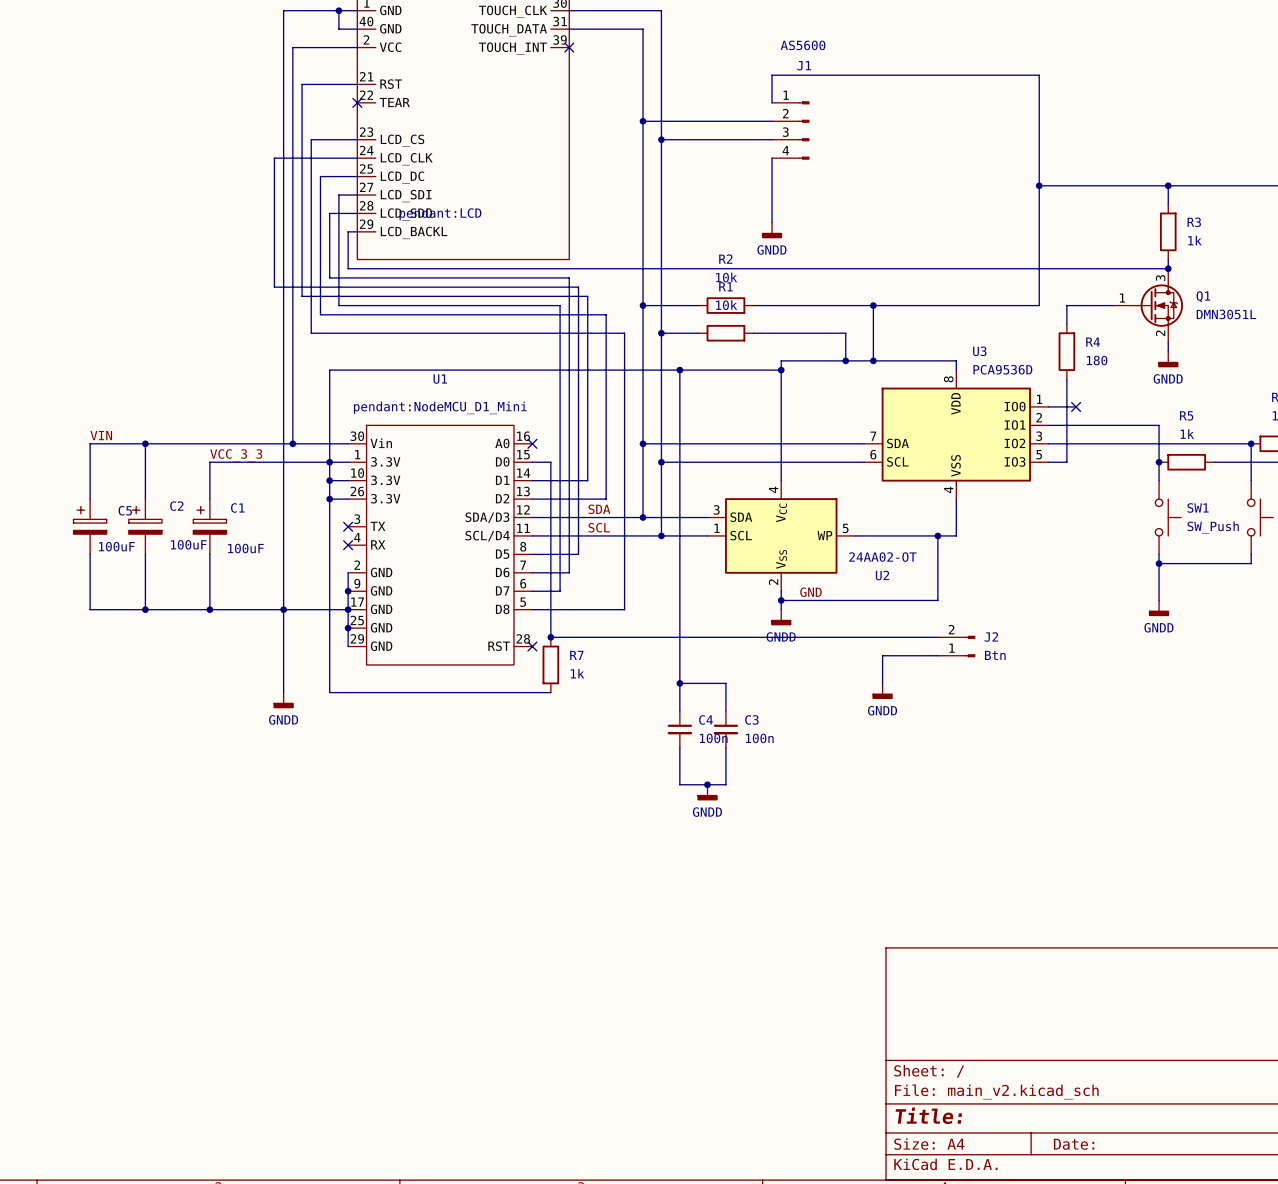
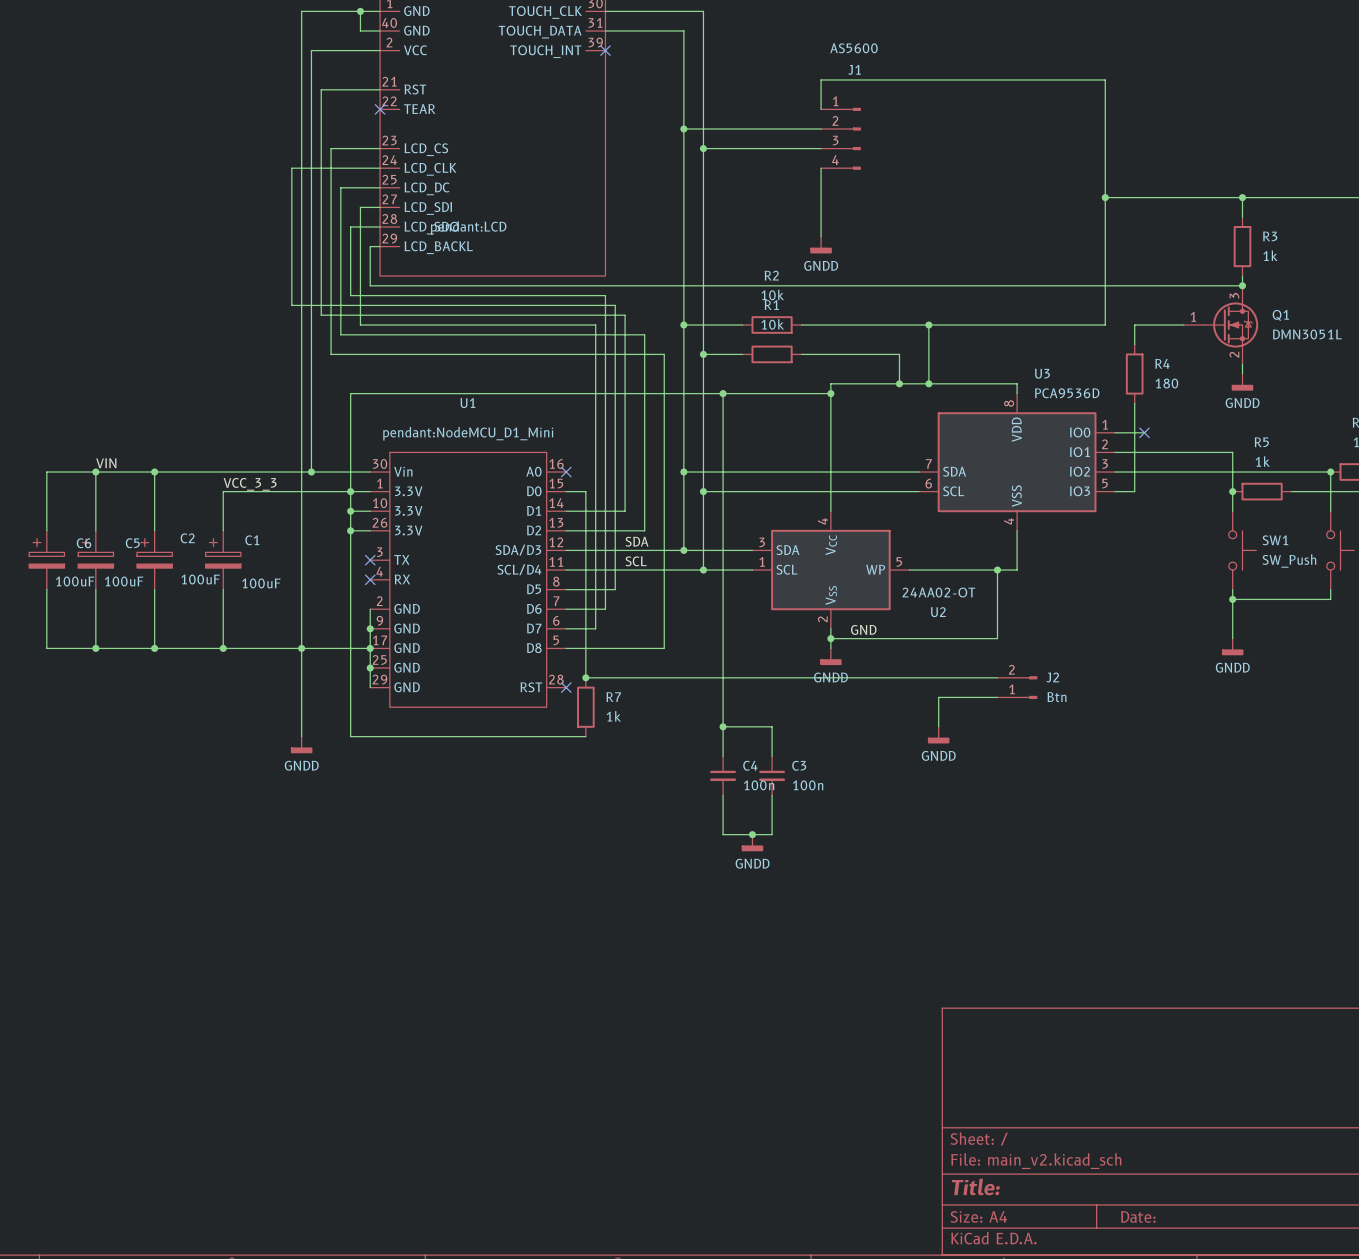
wire: none -> (95, 472) (46, 472) (46, 530)
junction: none -> (95, 472)
C6: none -> 100uF (46, 560)
wire: none -> (46, 589) (46, 648) (95, 648)
junction: none -> (95, 648)

